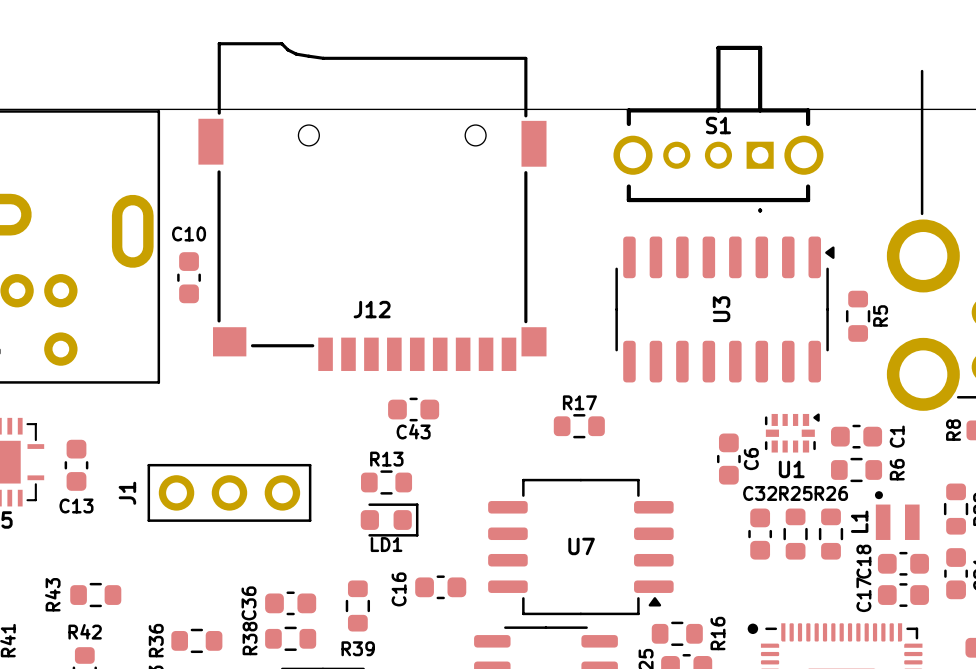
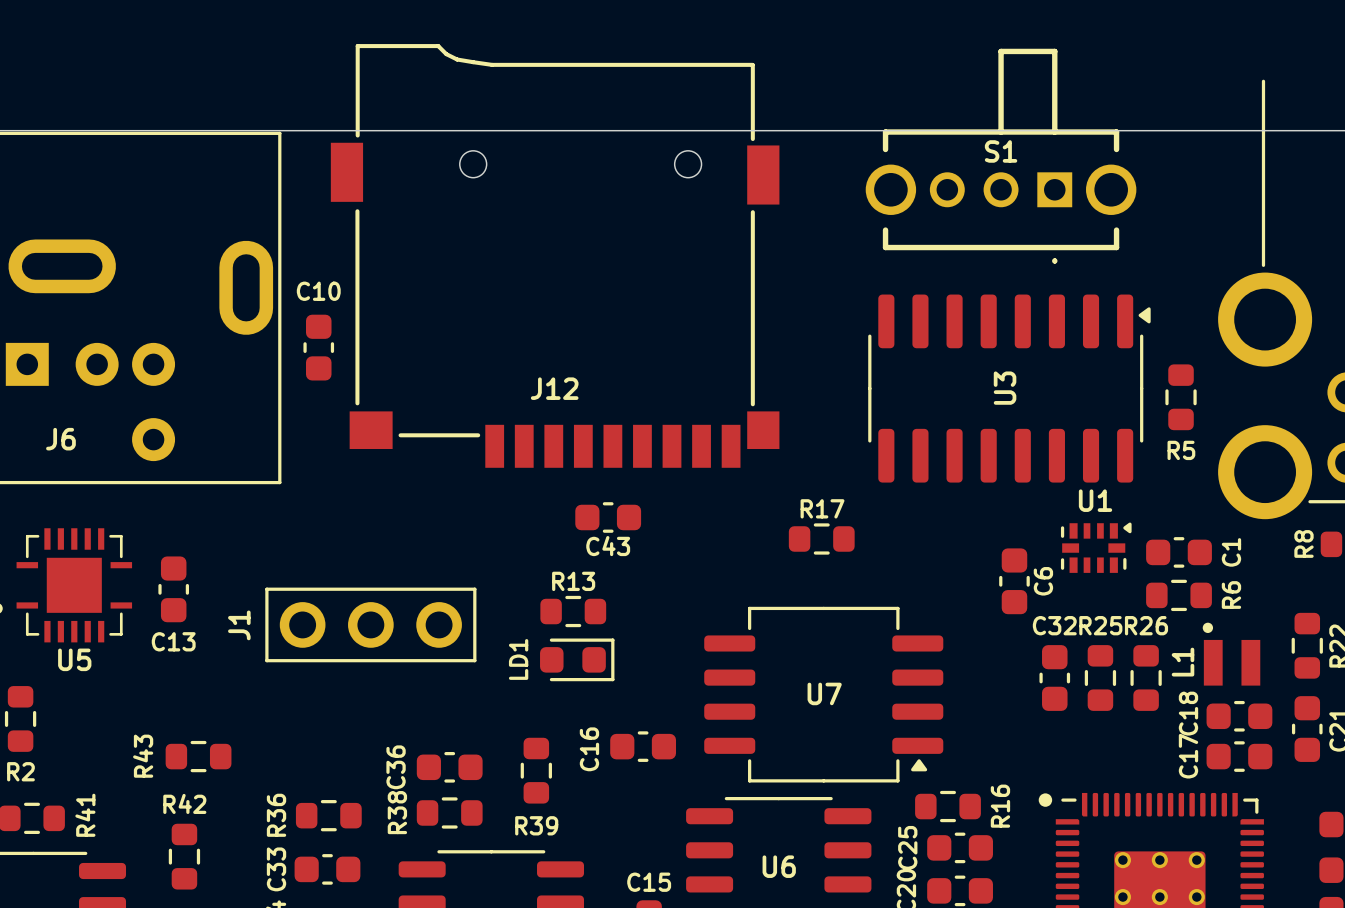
R5 name rotation: 0° (880, 315) -> 90° clockwise (1181, 450)
R5 name position: R5 (880, 315) -> R5 (1181, 450)
U1 name position: U1 (791, 469) -> U1 (1095, 500)
LD1 name rotation: 0° (386, 544) -> 90° counterclockwise (518, 659)
LD1 name position: LD1 (386, 544) -> LD1 (518, 659)

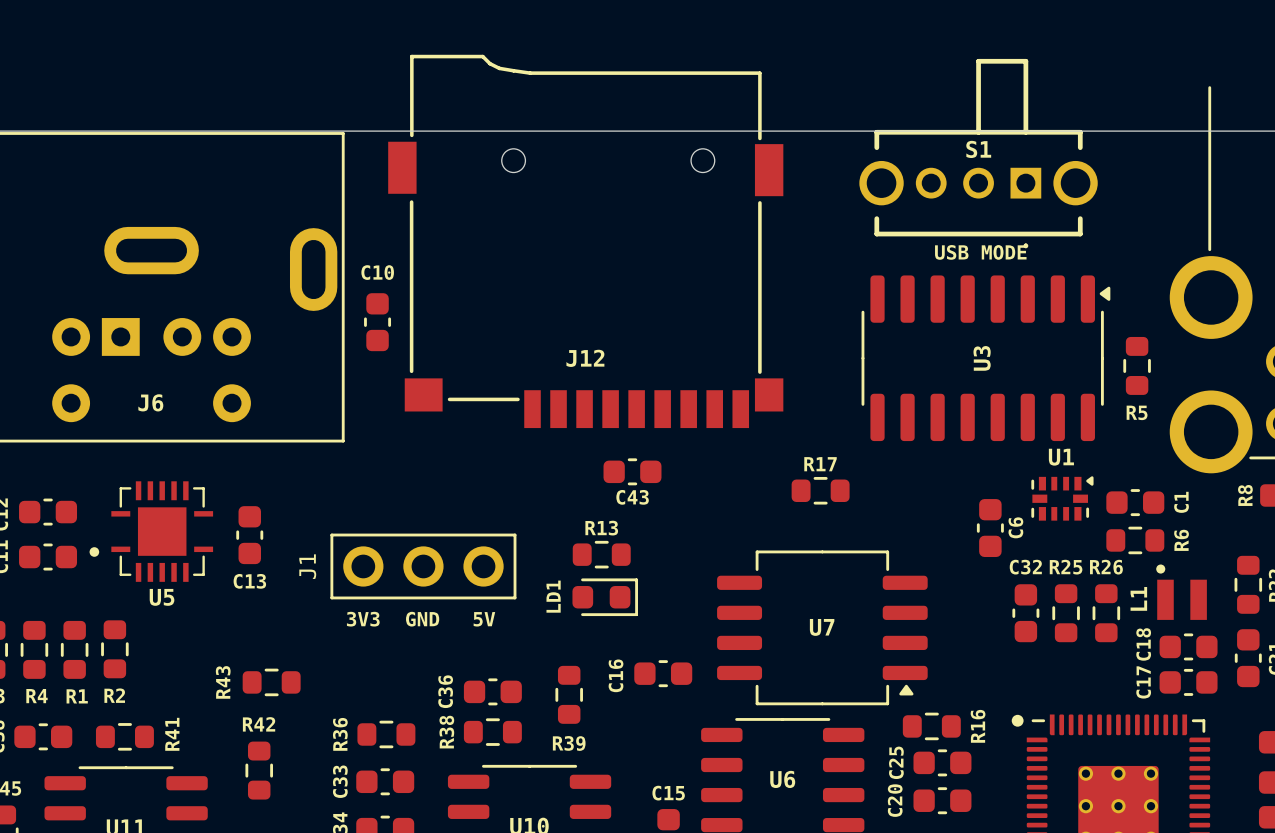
text: none -> USB MODE (980, 252)
text: none -> 3V3 (363, 619)
text: none -> GND (422, 619)
text: none -> 5V (484, 619)

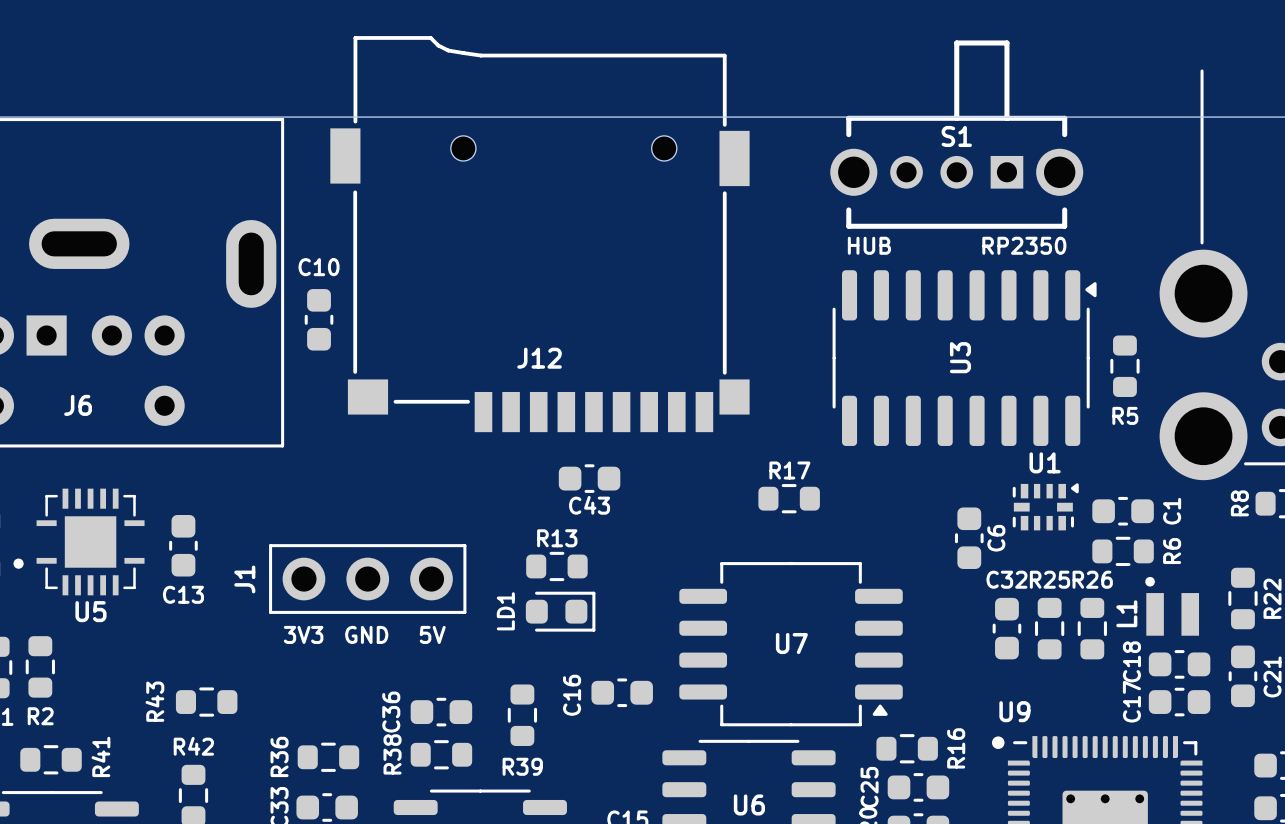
S1 footprint: [859, 58, 1098, 249] -> [830, 40, 1084, 229]
text: none -> HUB (869, 245)
text: USB MODE (980, 252) -> none
text: none -> RP2350 (1024, 245)
U9 name: none -> U9 (1014, 711)

